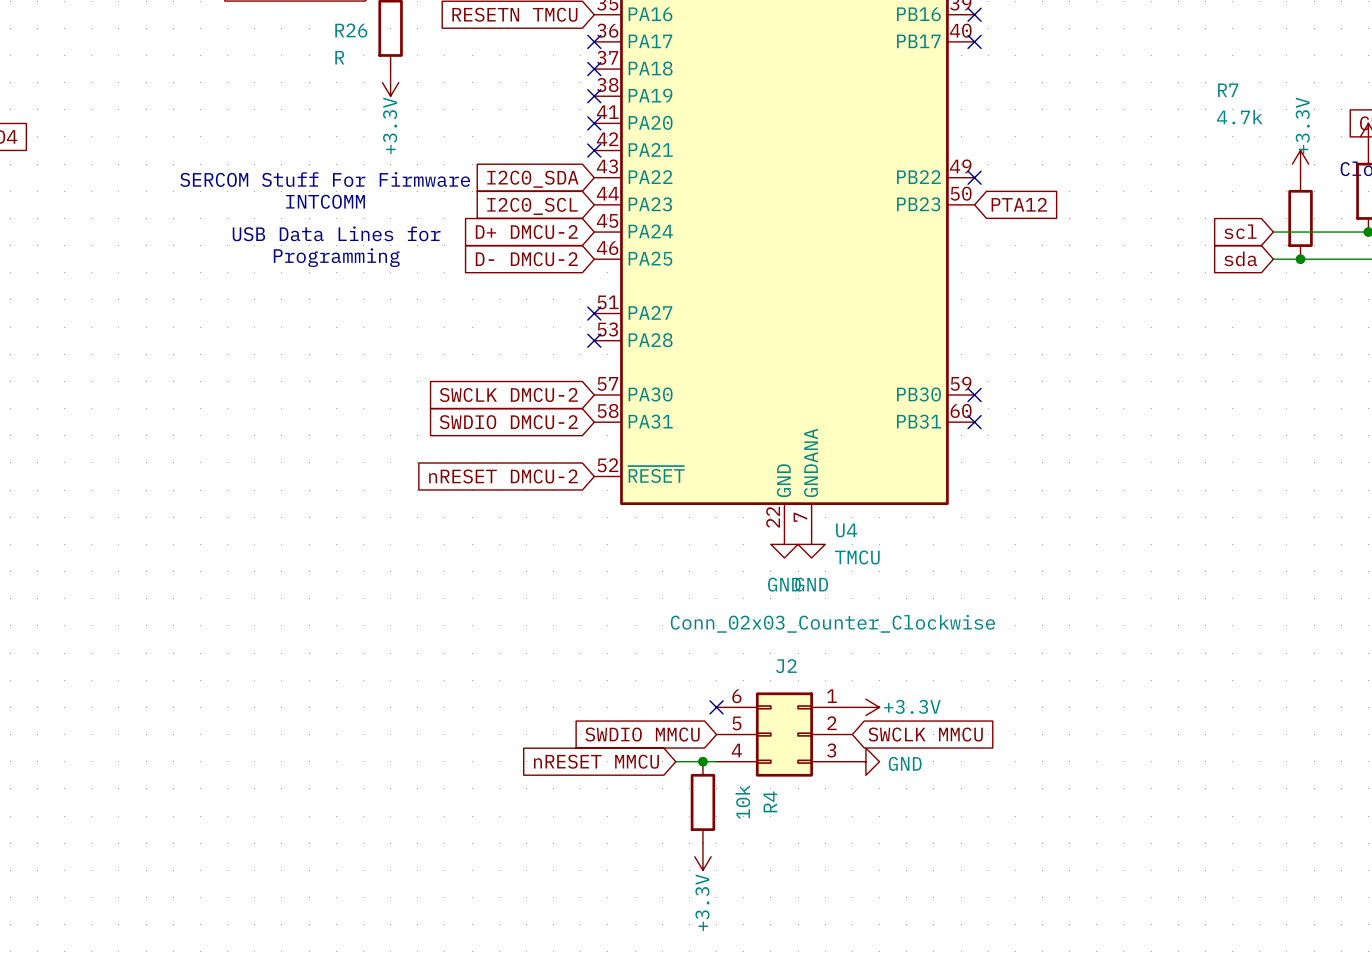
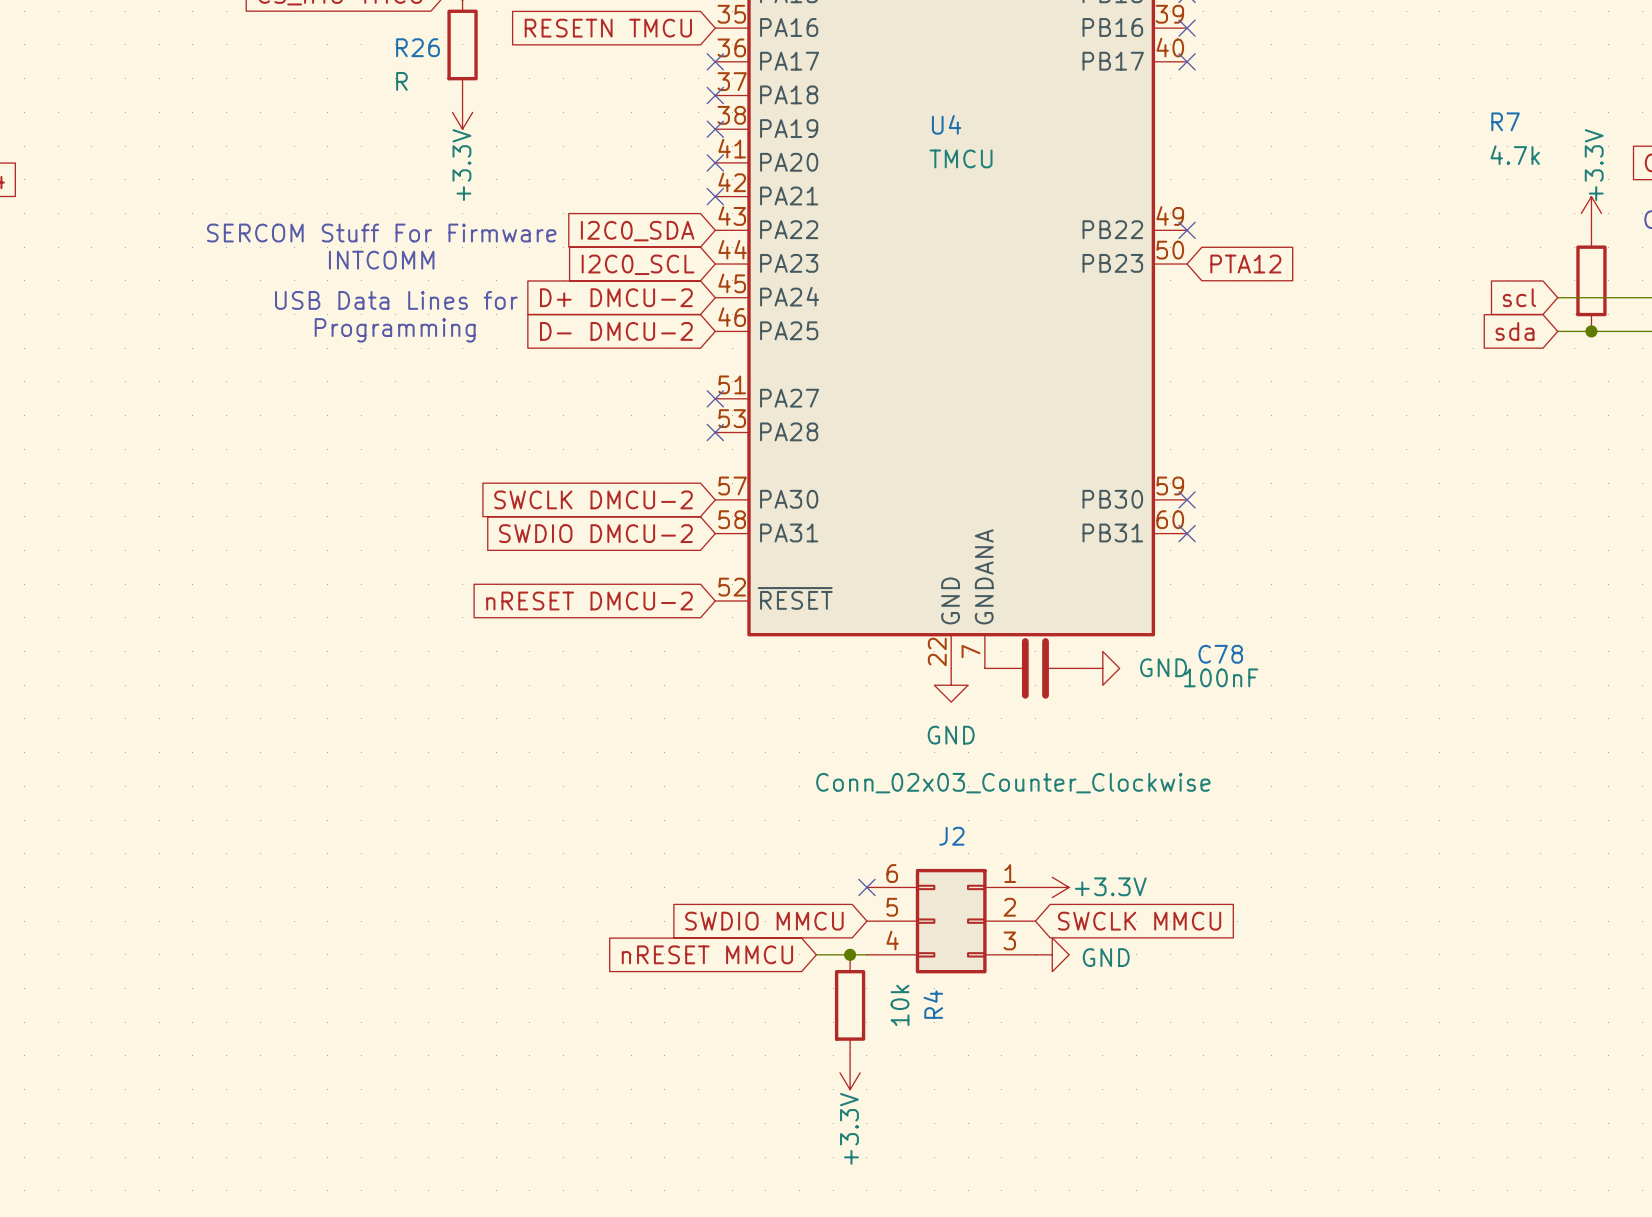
U4 name position: U4 (846, 530) -> U4 (946, 124)
C78: none -> 100nF (1035, 668)
power symbol rotation: 0° (811, 544) -> 90° counterclockwise (1102, 668)
power symbol position: GND (811, 544) -> GND (1102, 668)
U4 value position: TMCU (857, 557) -> TMCU (961, 158)

